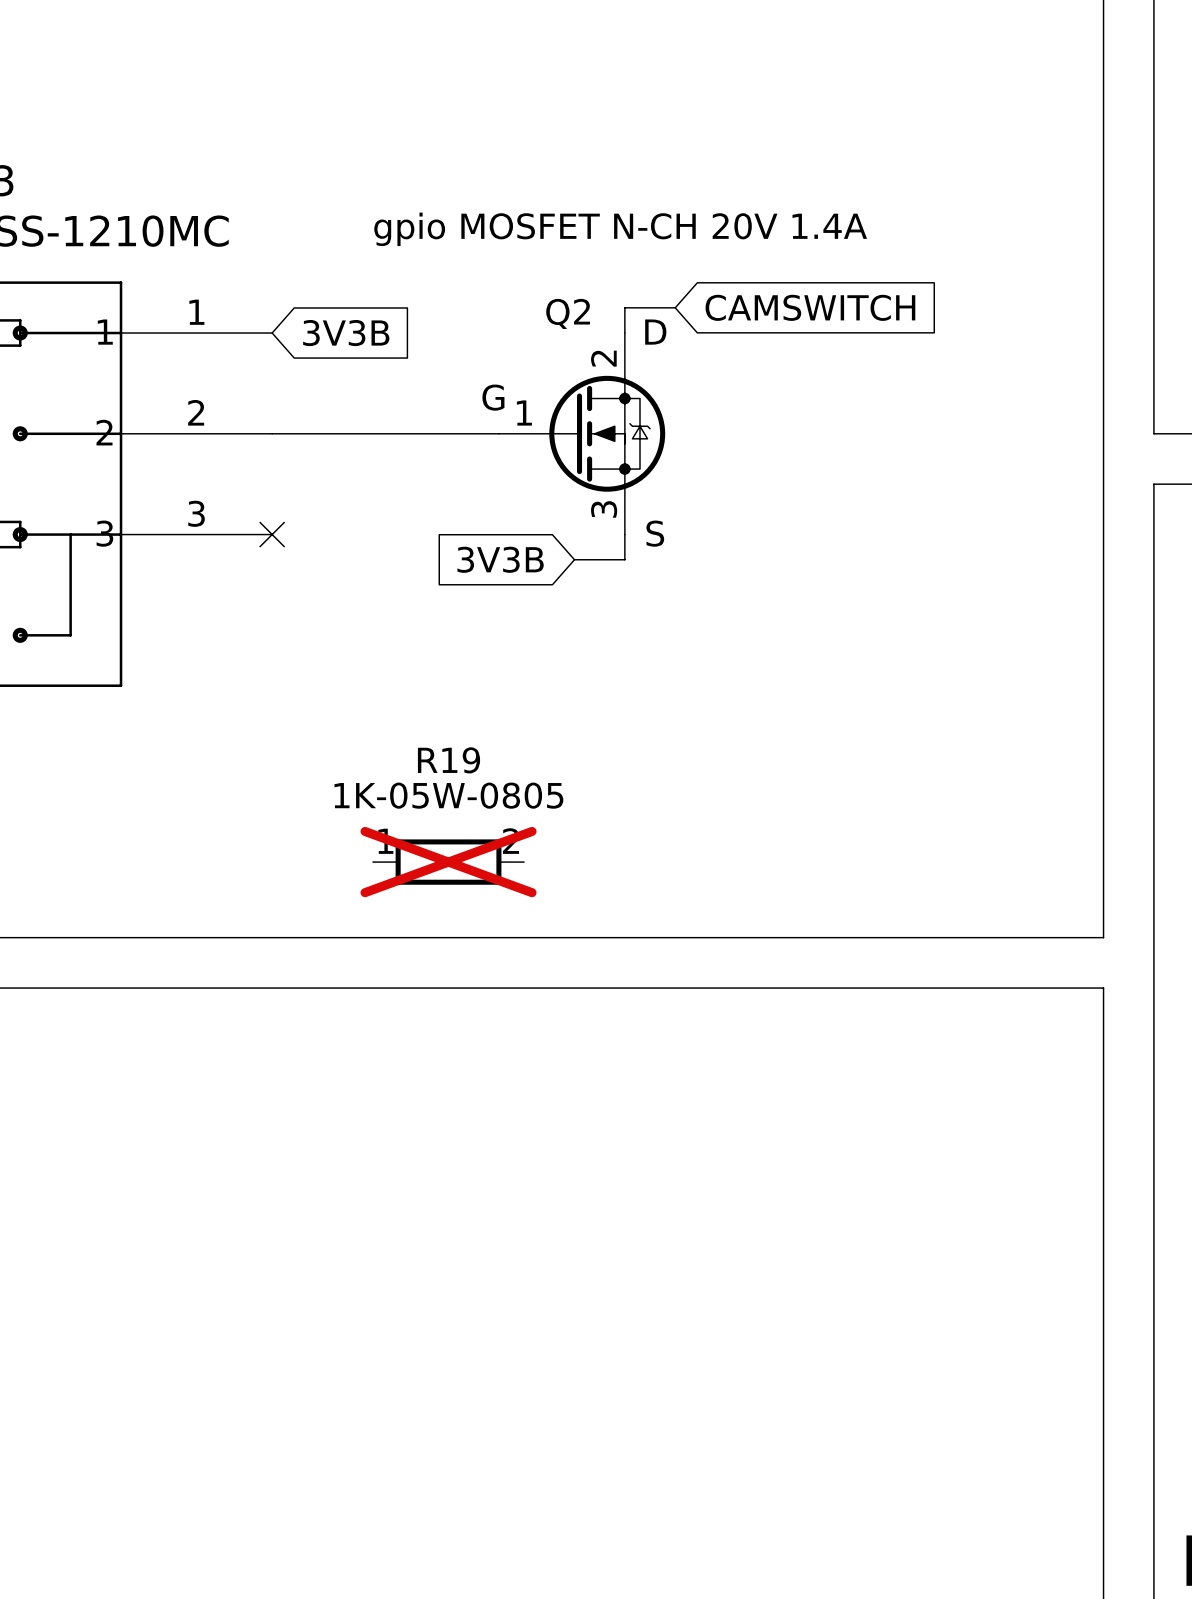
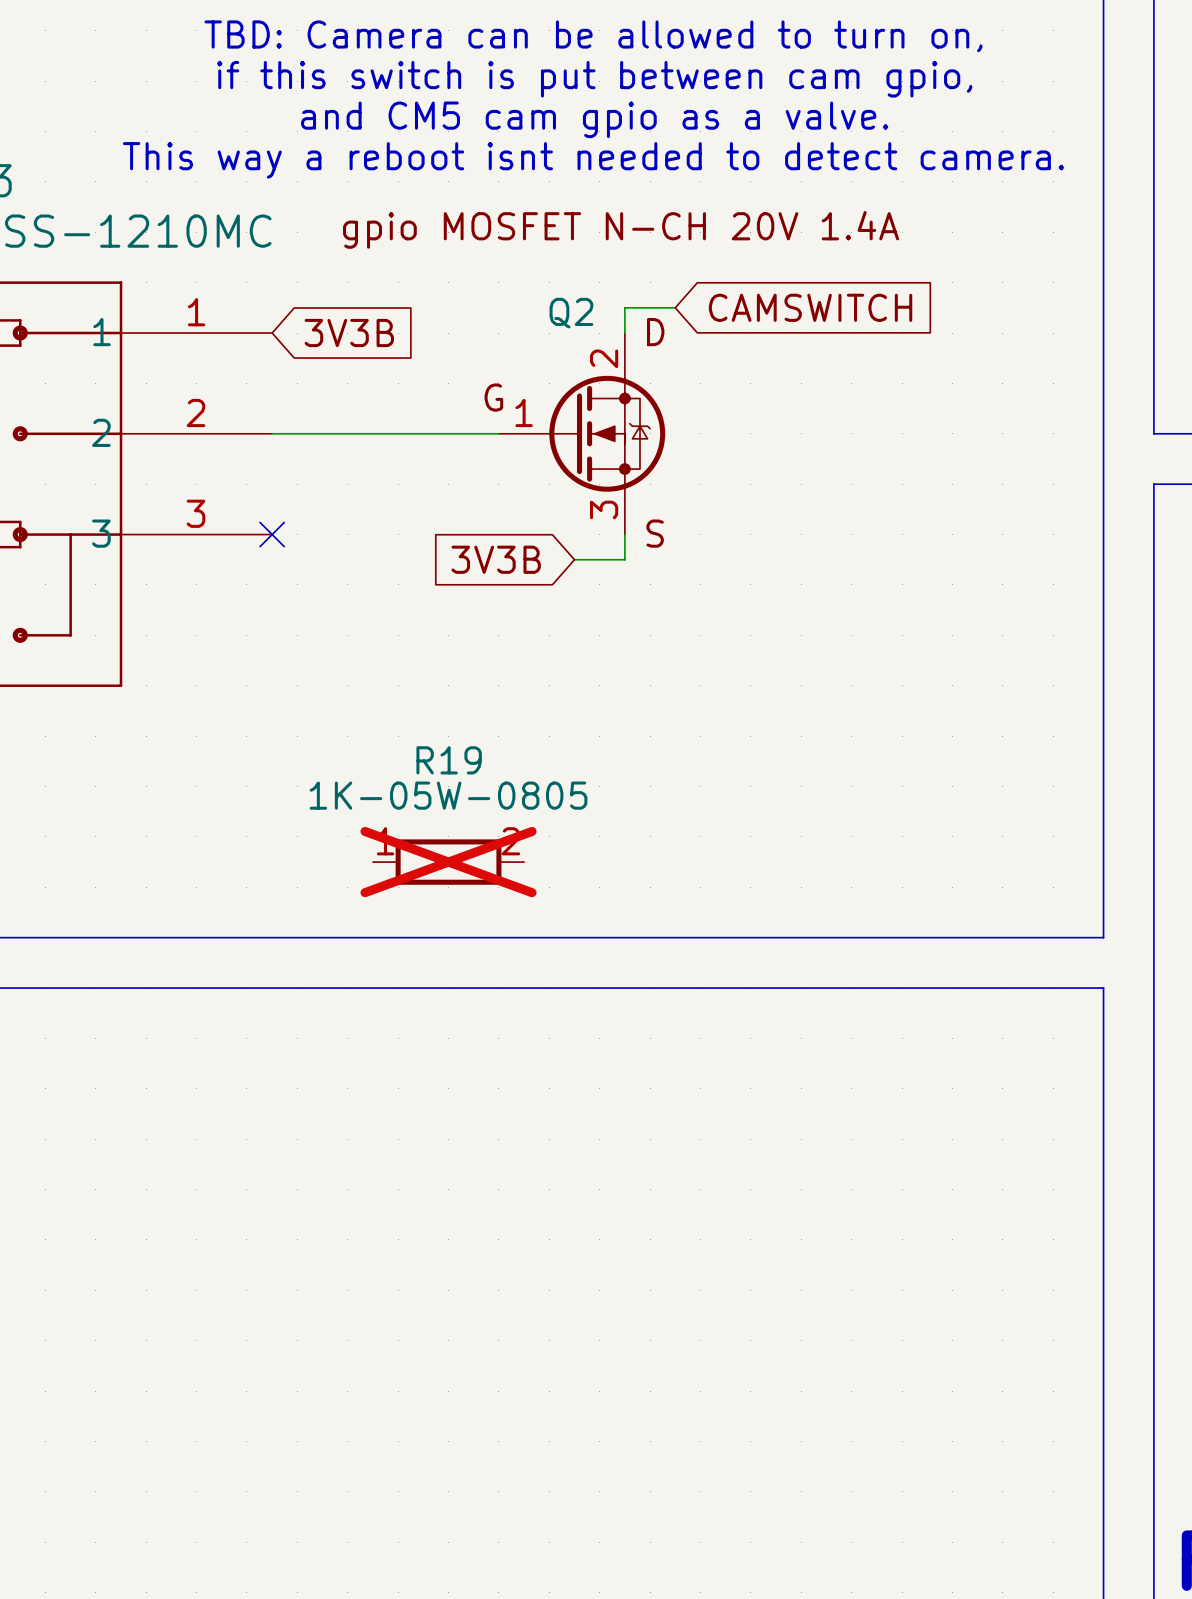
text: none -> TBD: Camera can be allowed to turn on, (593, 36)
text: none -> if this switch is put between cam gpio, (594, 79)
text: none -> and CM5 cam gpio as a valve. (594, 119)
text: none -> This way a reboot isnt needed to detect camera. (593, 160)

